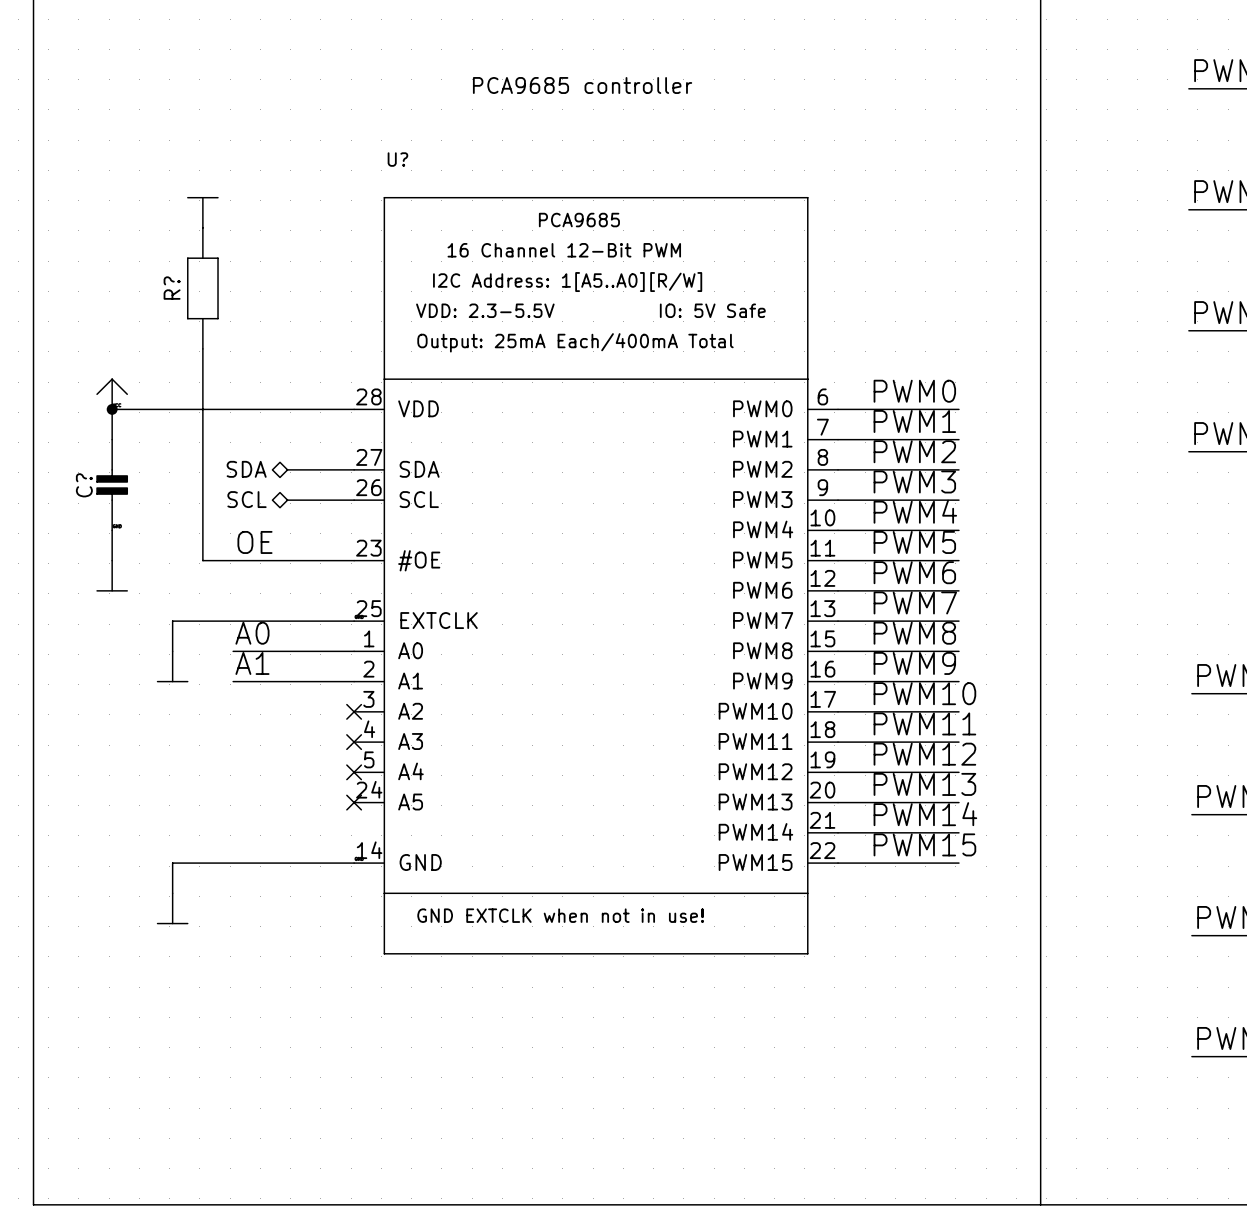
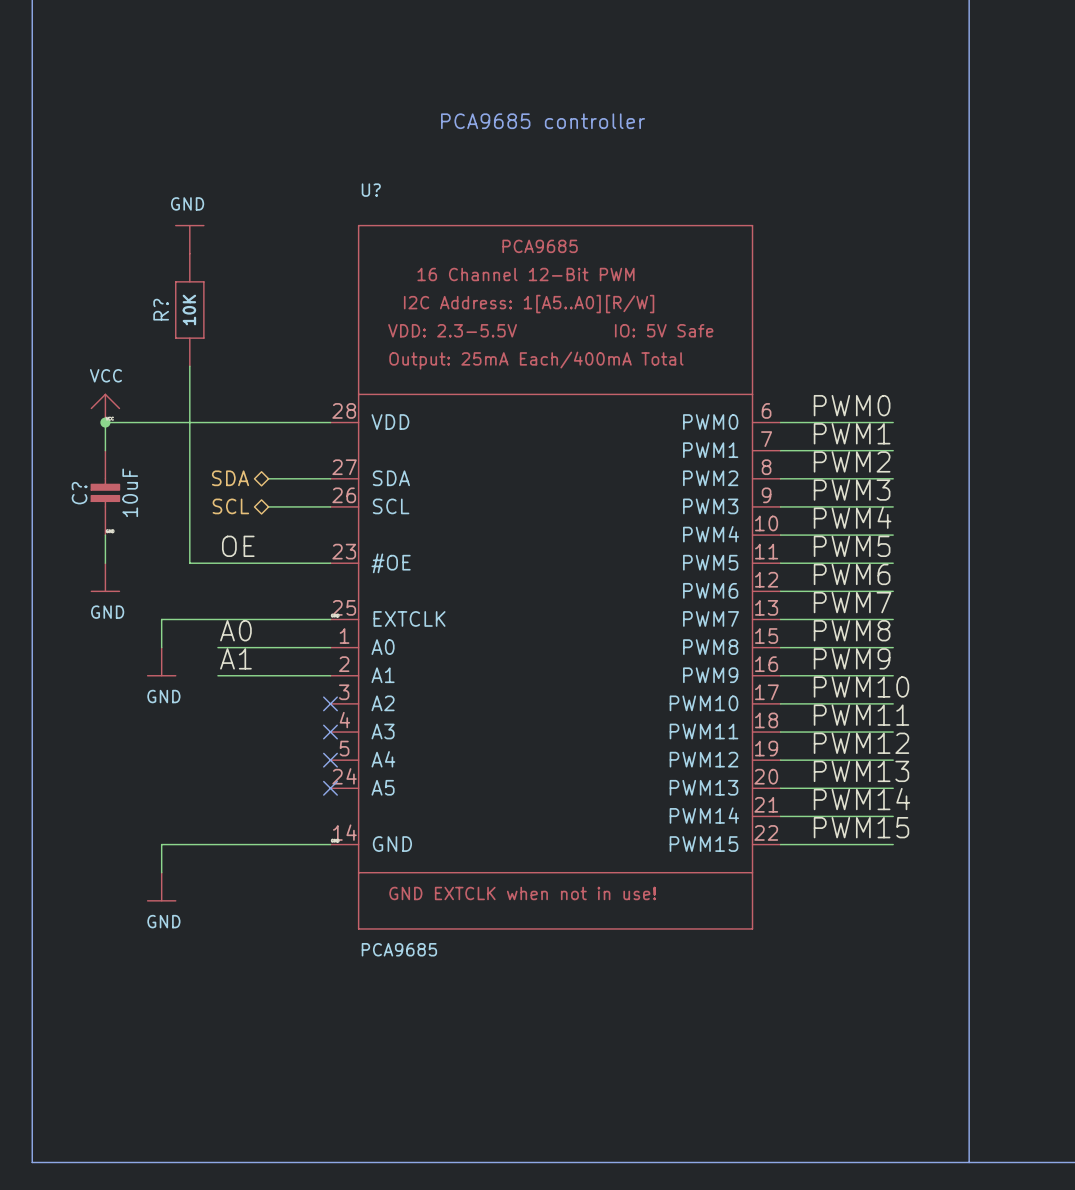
power symbol text: none -> GND (187, 203)
R? value: none -> 10K (189, 310)
power symbol text: none -> VCC (105, 375)
C? value: none -> 10uF (130, 492)
power symbol text: none -> GND (107, 612)
power symbol text: none -> GND (163, 696)
power symbol text: none -> GND (163, 921)
U? value: none -> PCA9685 (399, 949)

